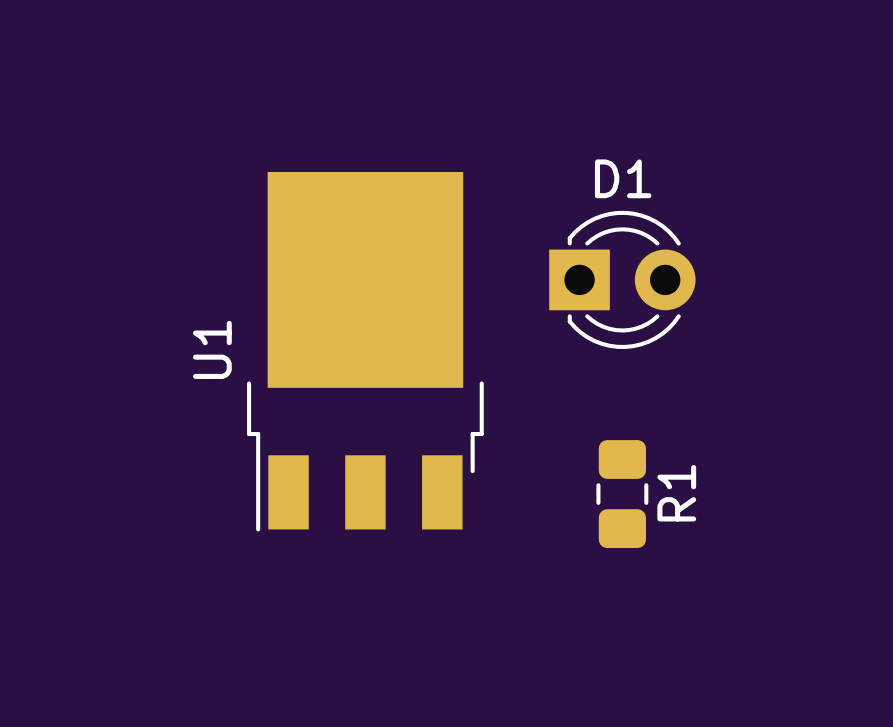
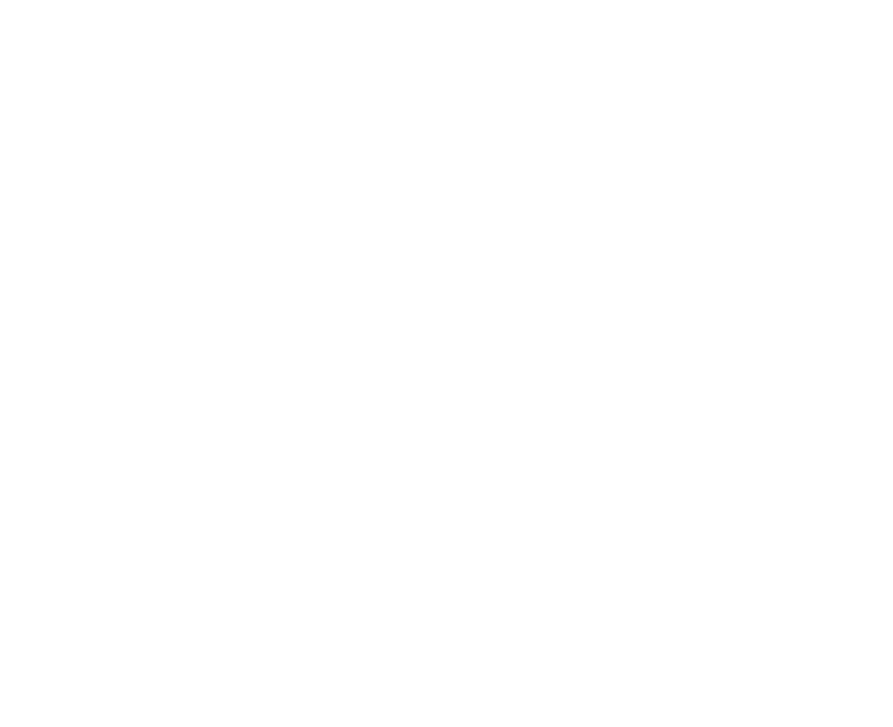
D1: (622, 279) -> none
U1: (365, 351) -> none
R1: (622, 494) -> none

